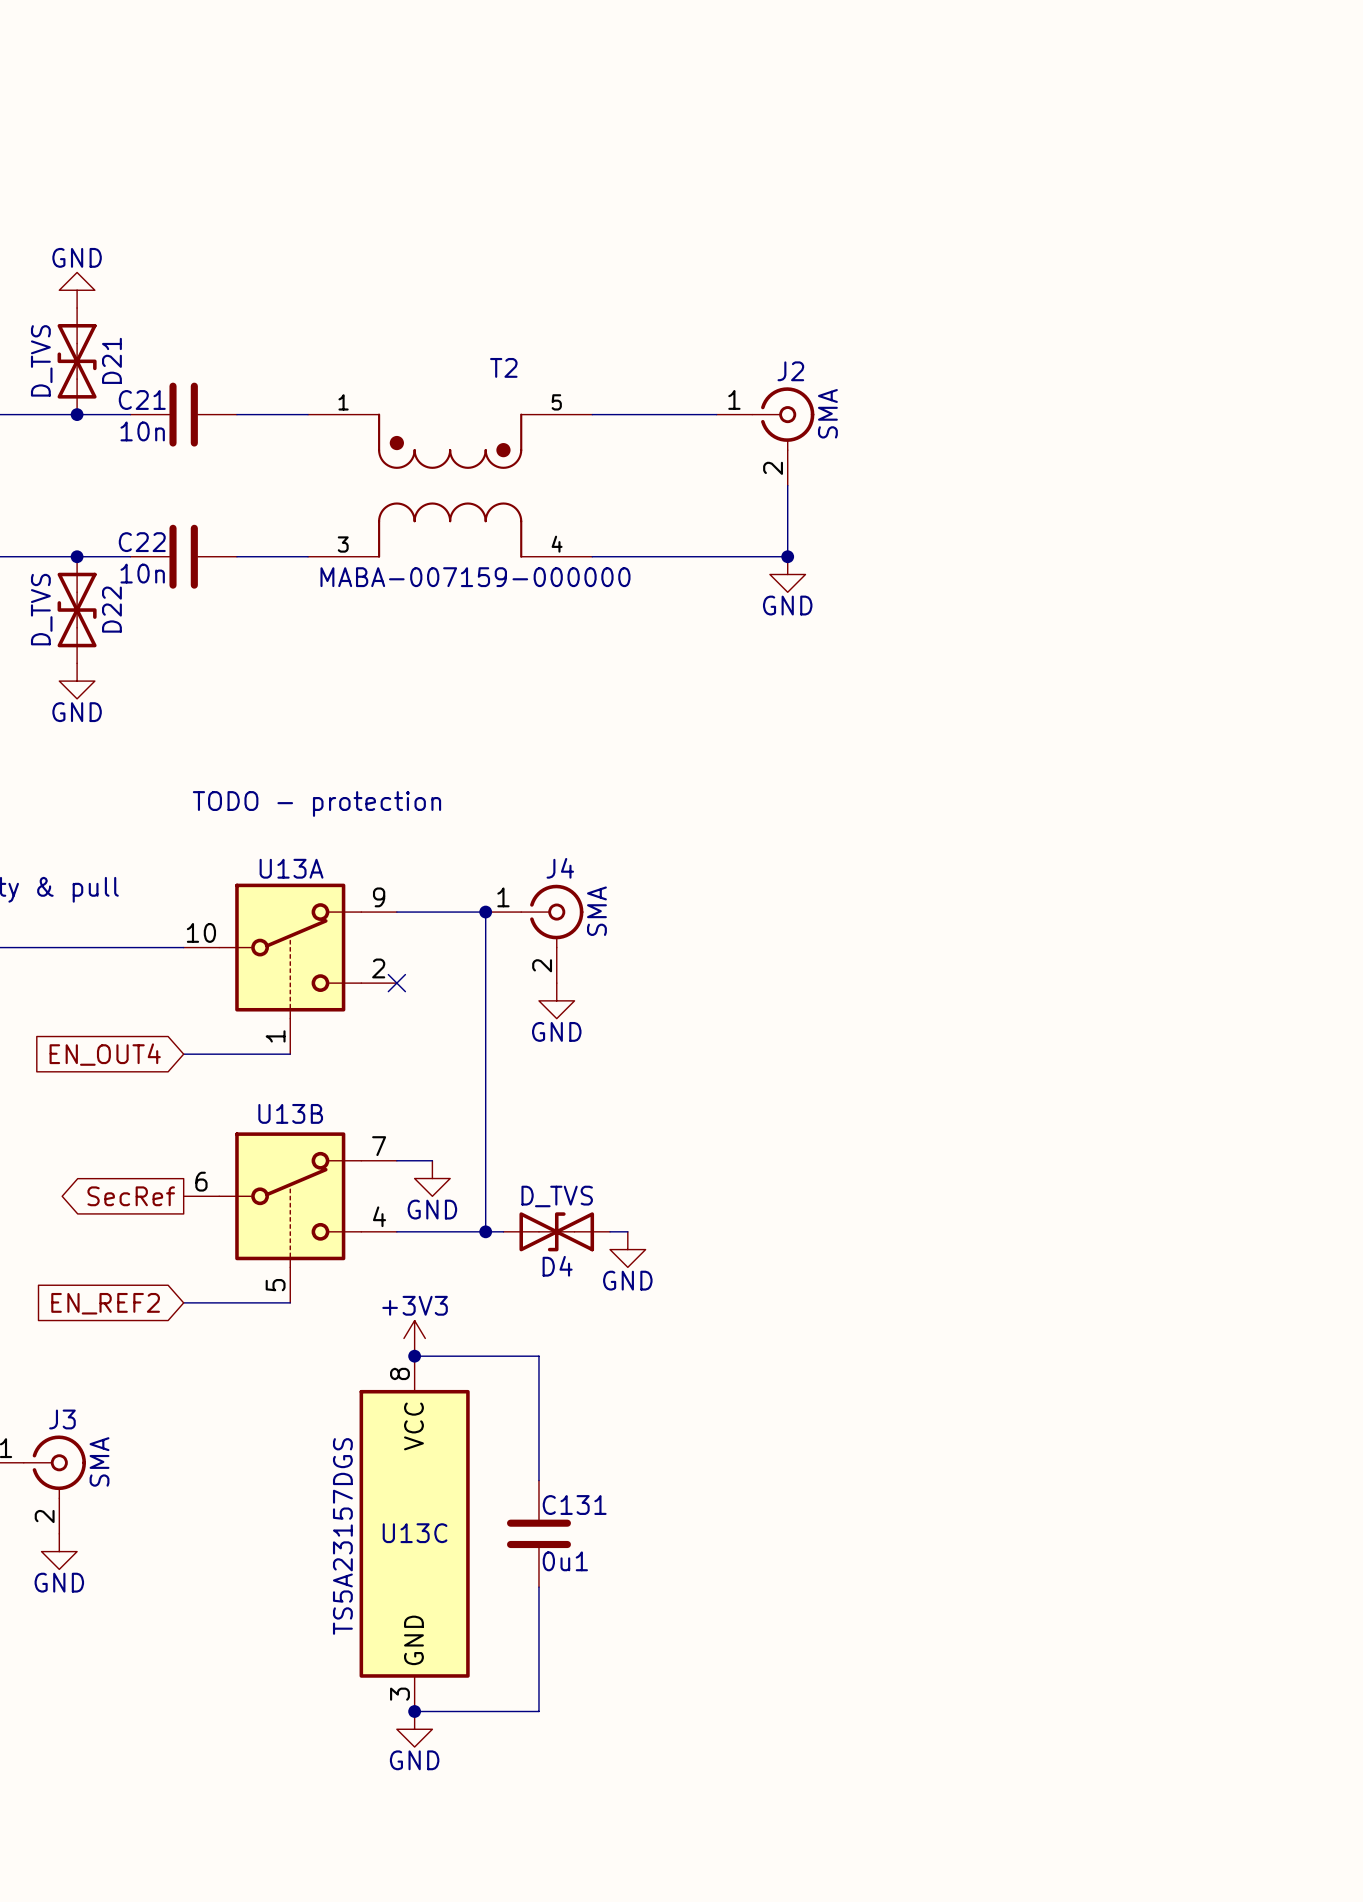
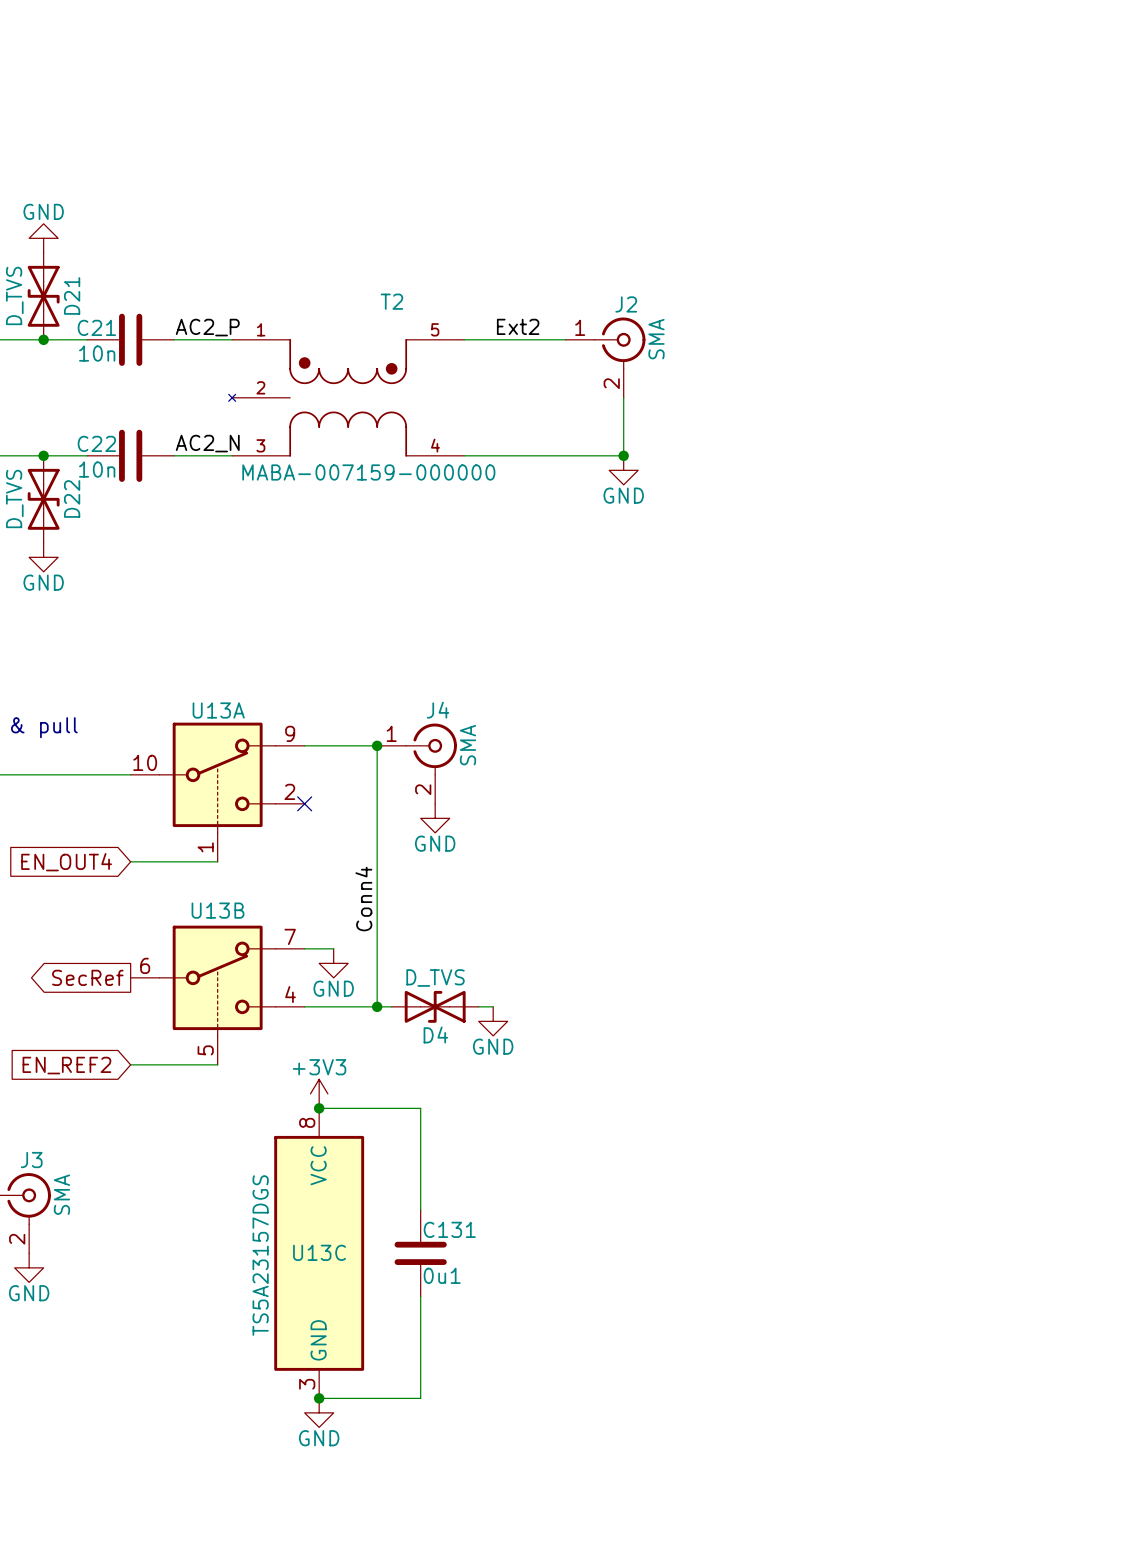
label: none -> Ext2 (518, 326)
label: none -> AC2_P (207, 327)
T2 symbol: [308, 413, 593, 558] -> [228, 338, 465, 457]
label: none -> AC2_N (207, 443)
text: TODO - protection (316, 803) -> none
label: none -> Conn4 (363, 899)

